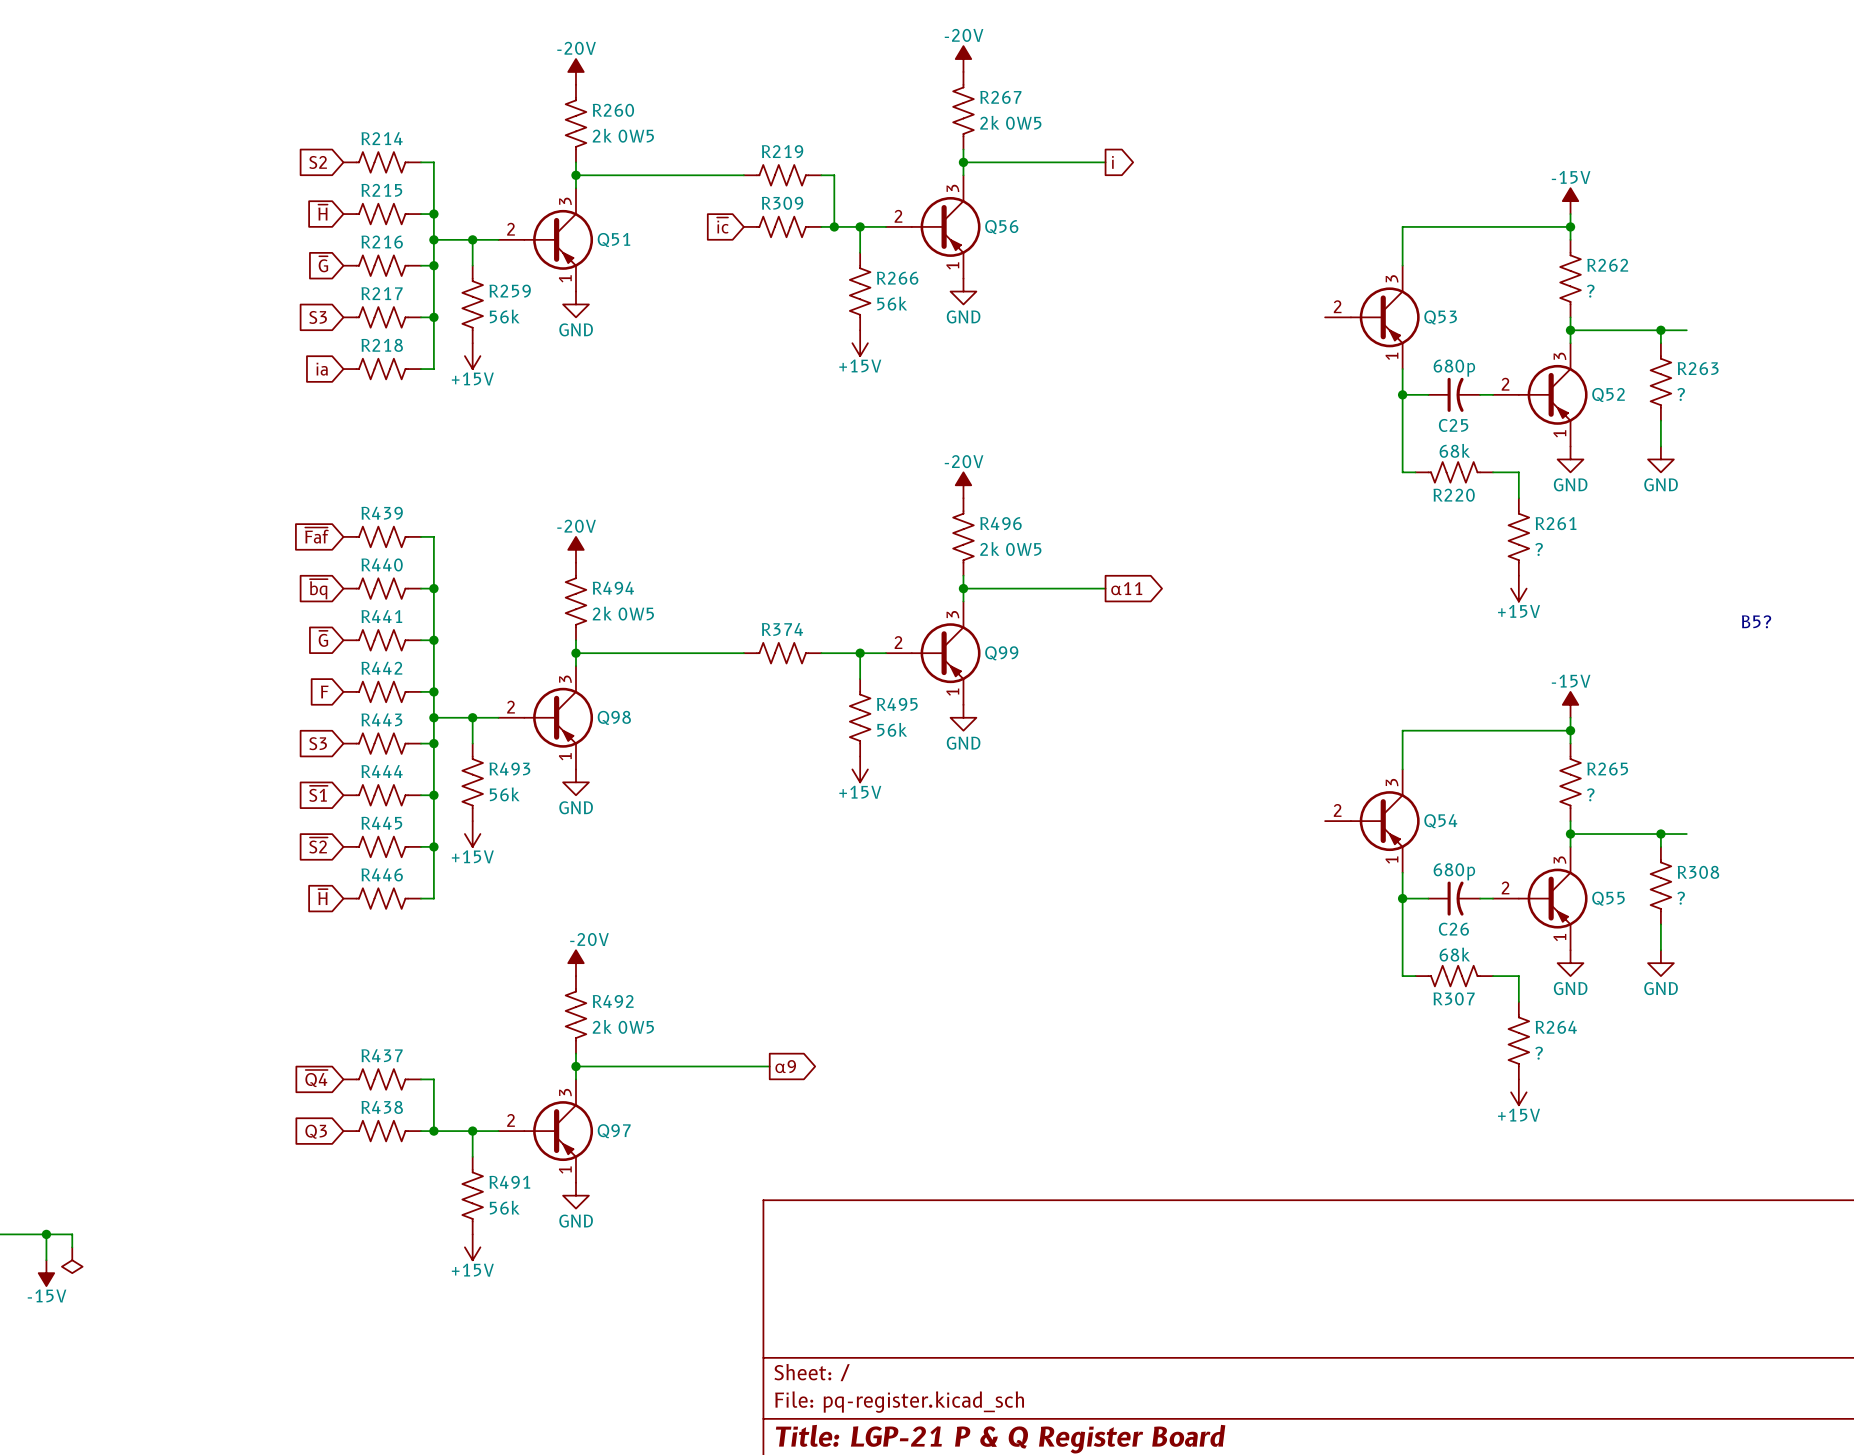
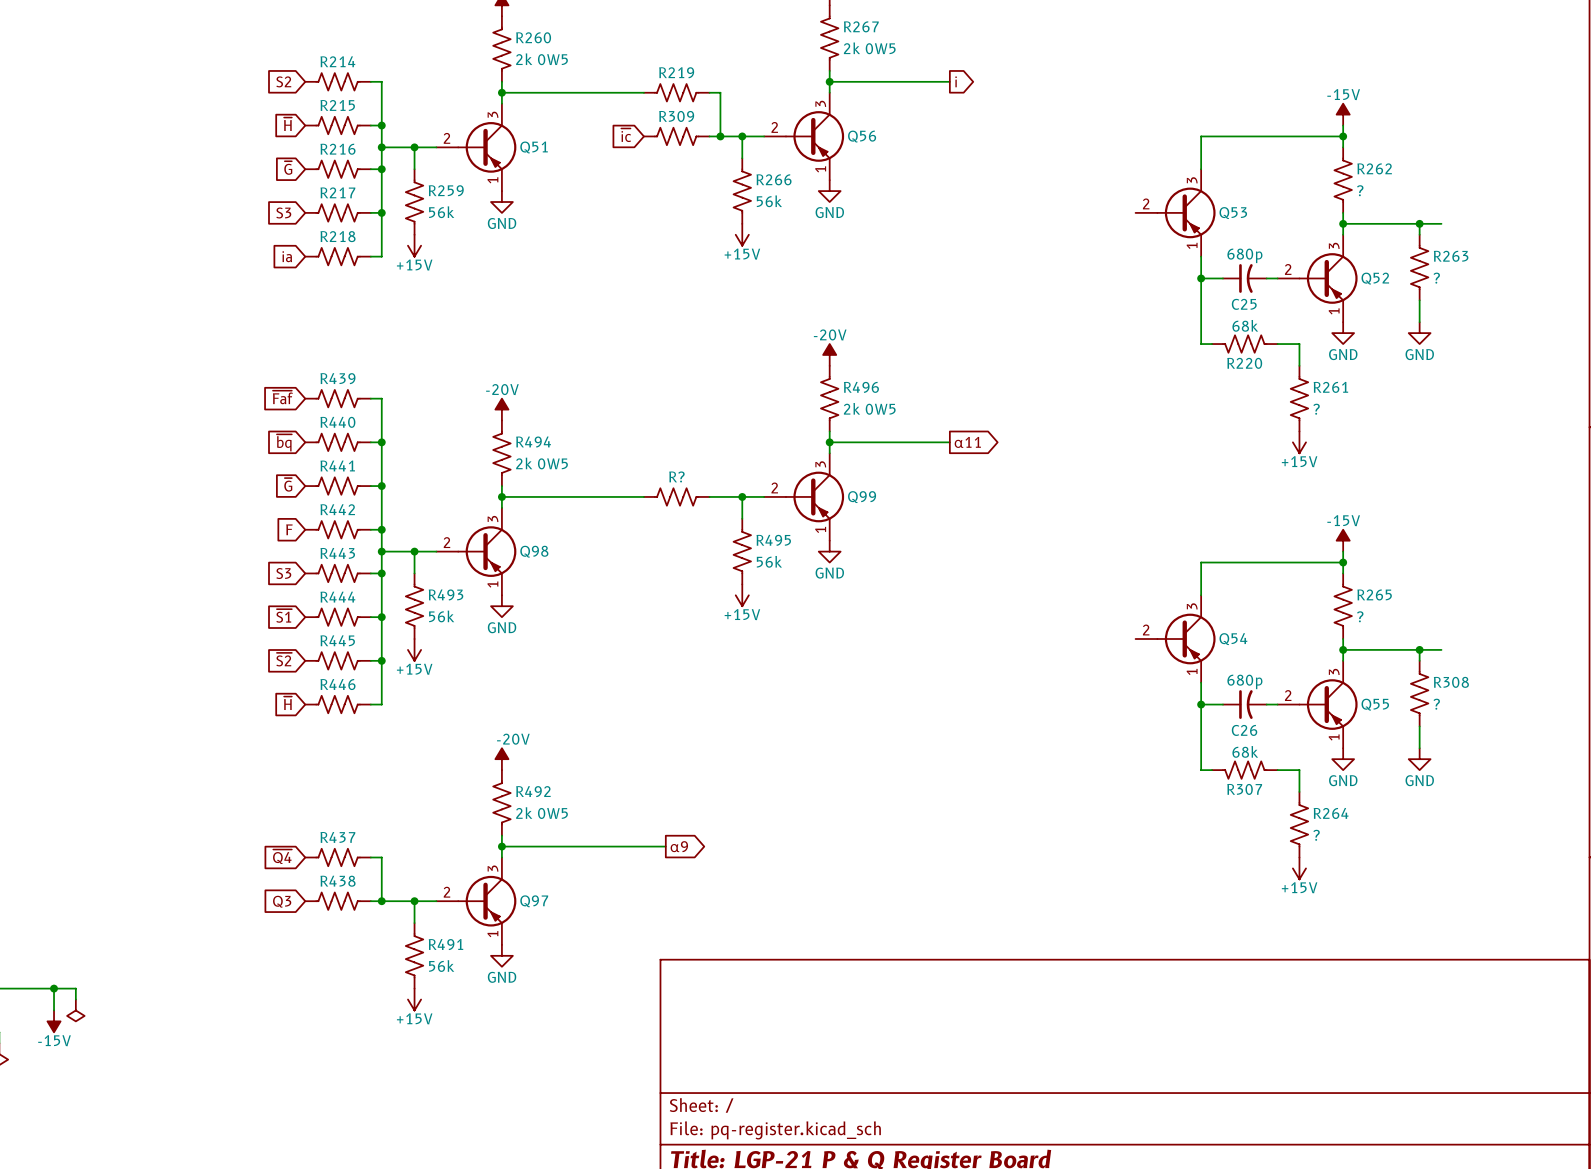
text: B5? (1756, 621) -> none
R374 name: R374 (782, 629) -> R? (676, 476)

